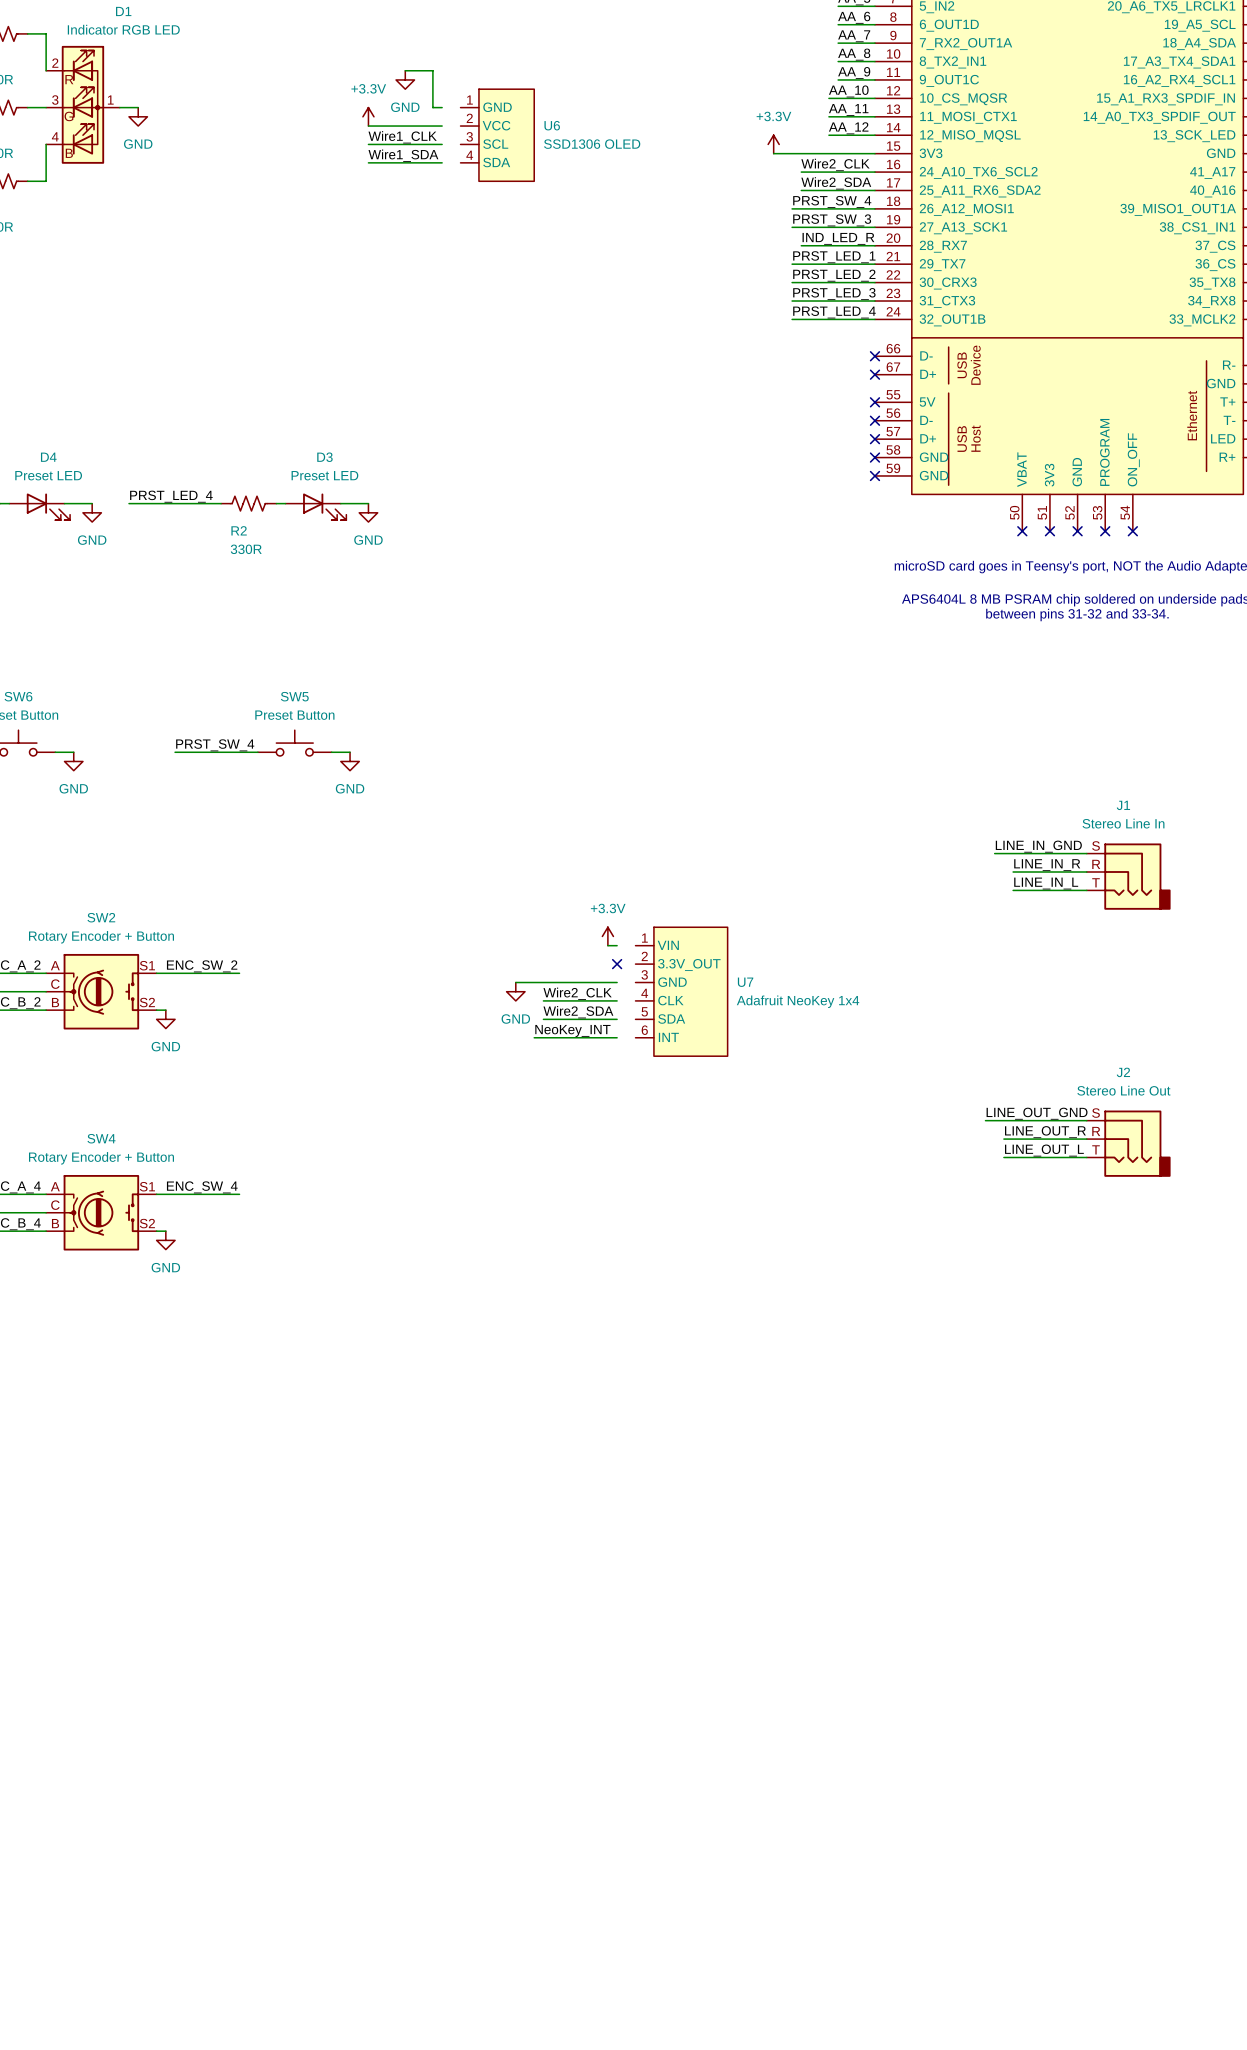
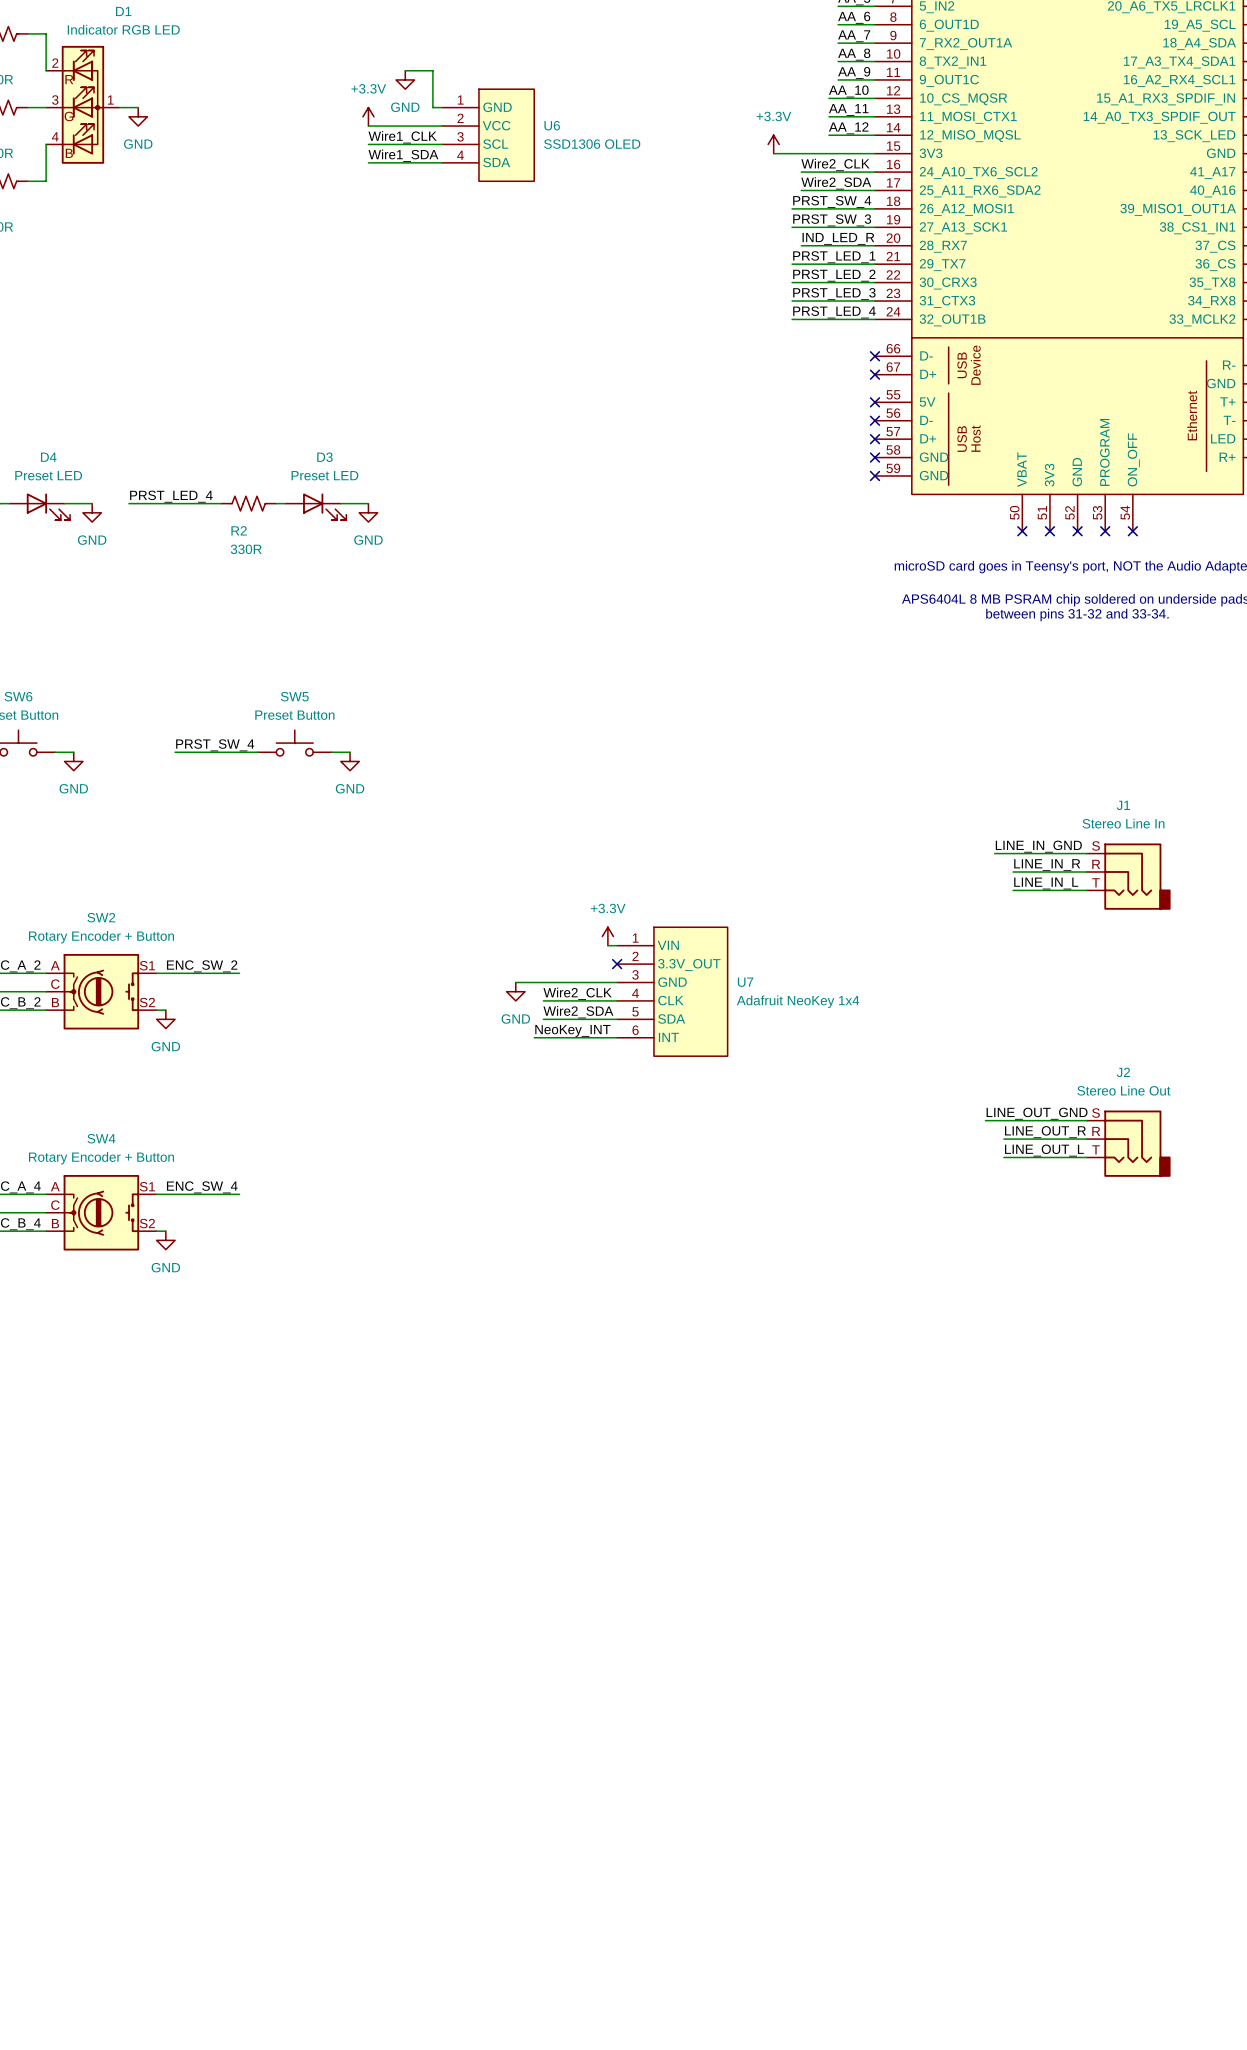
U6 symbol: [460, 89, 535, 182] -> [442, 89, 535, 182]
U7 symbol: [635, 927, 728, 1057] -> [617, 927, 728, 1057]

